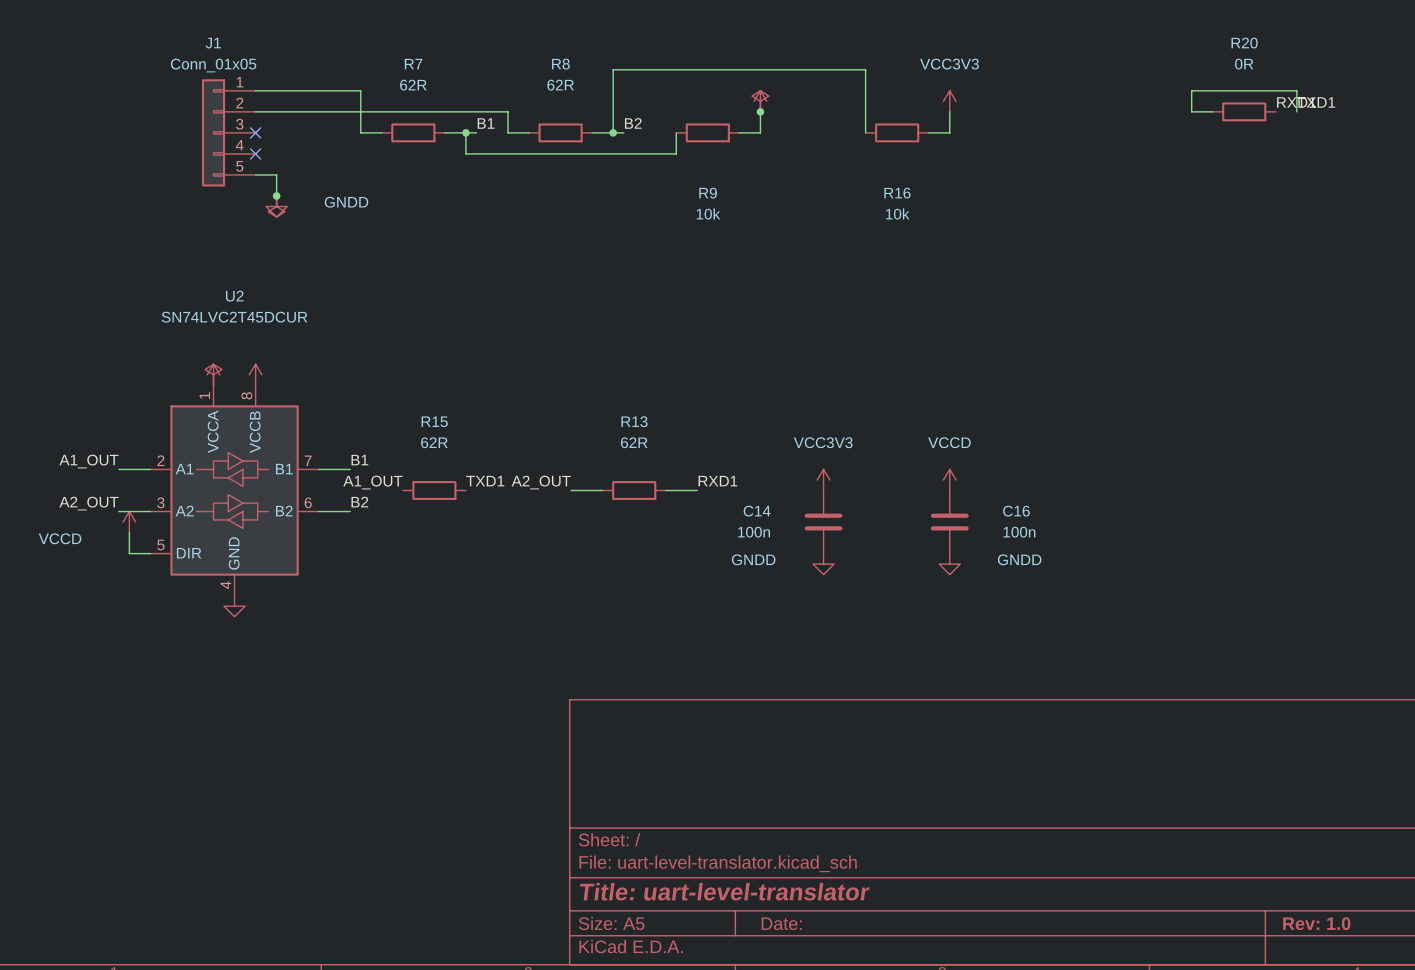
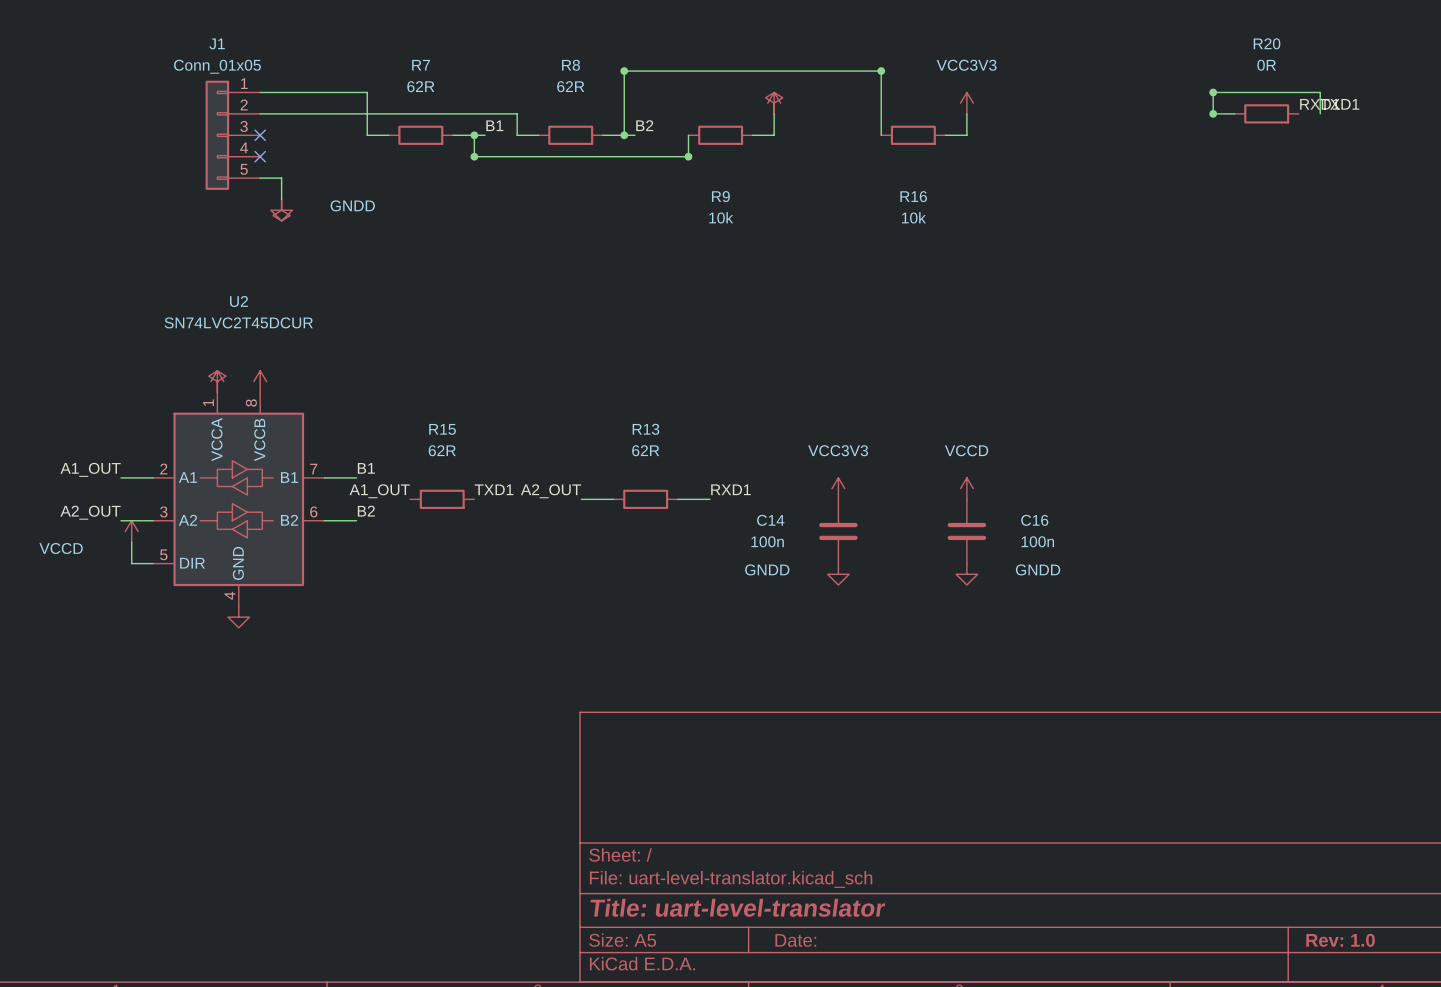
junction: none -> (624, 71)
junction: none -> (881, 71)
junction: none -> (1213, 92)
junction: (760, 111) -> none
junction: none -> (1213, 113)
junction: none -> (474, 156)
junction: none -> (688, 156)
junction: (276, 196) -> none

